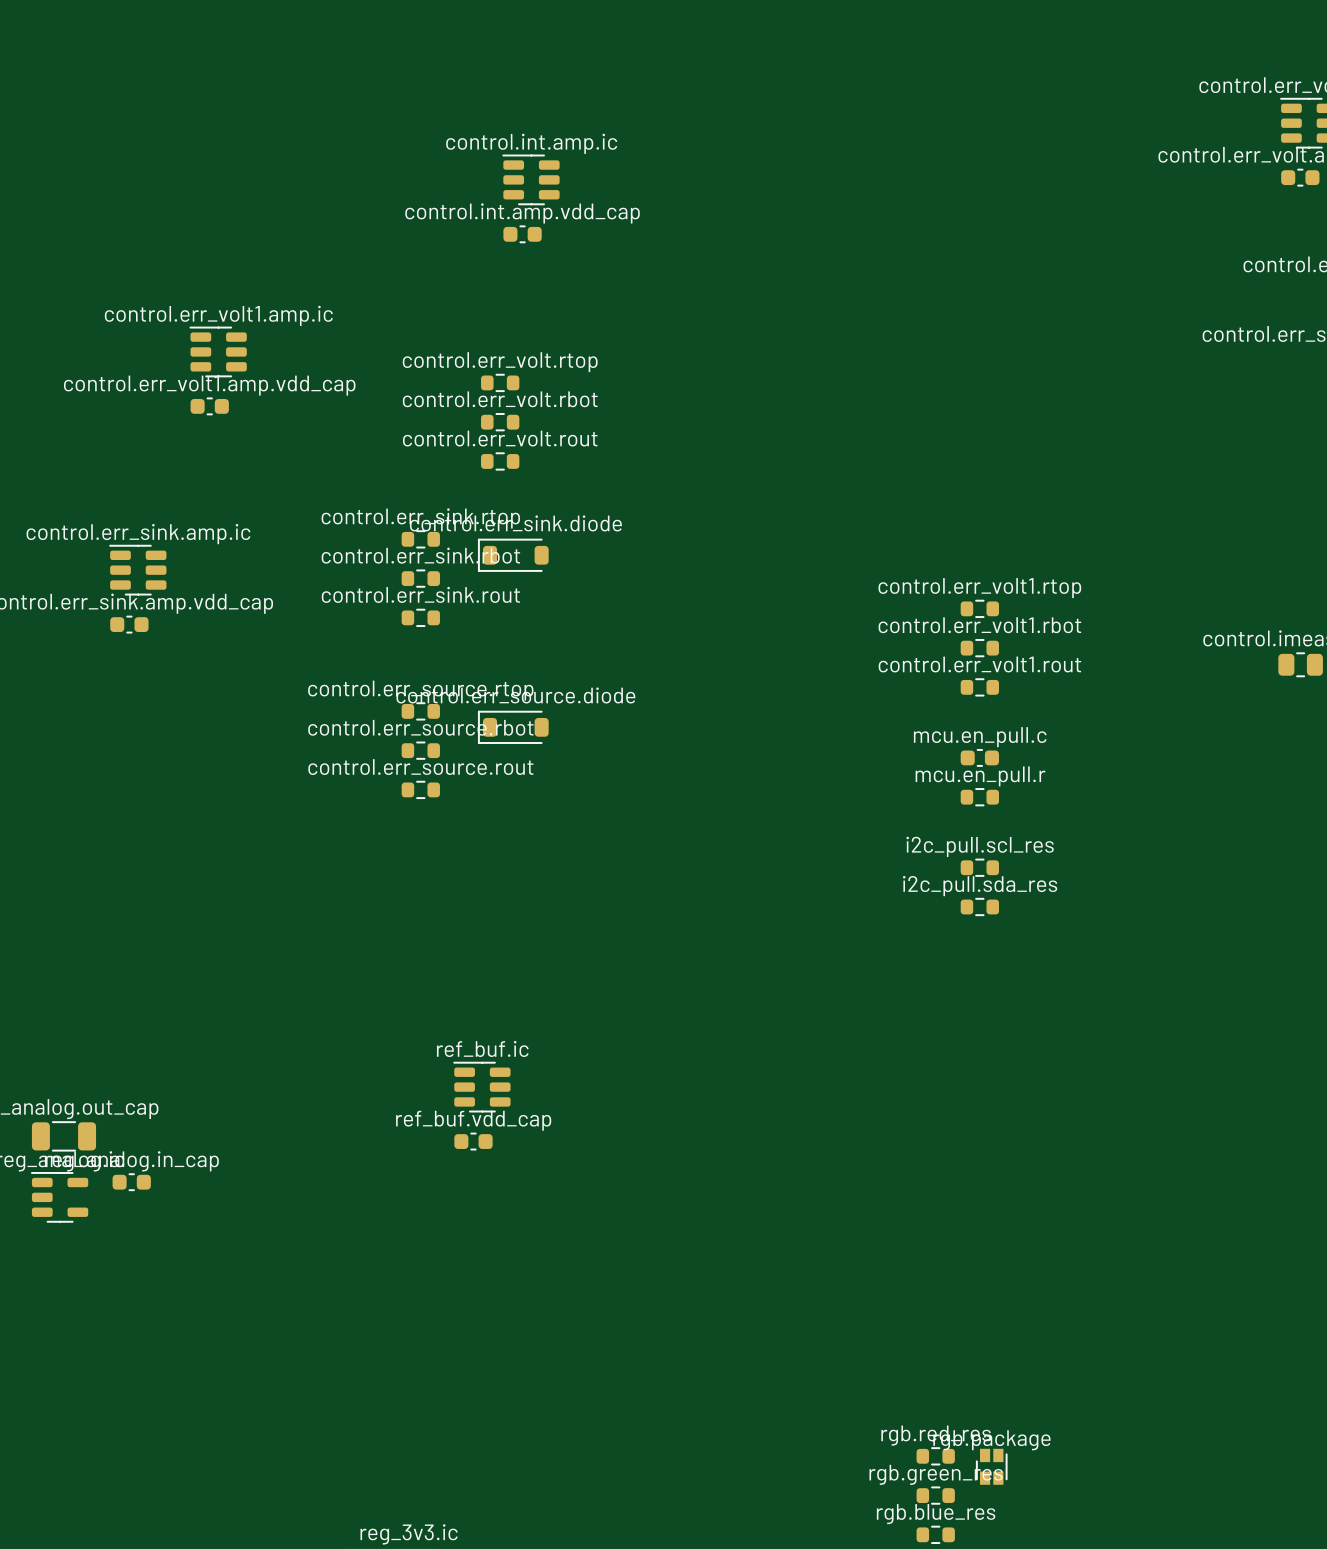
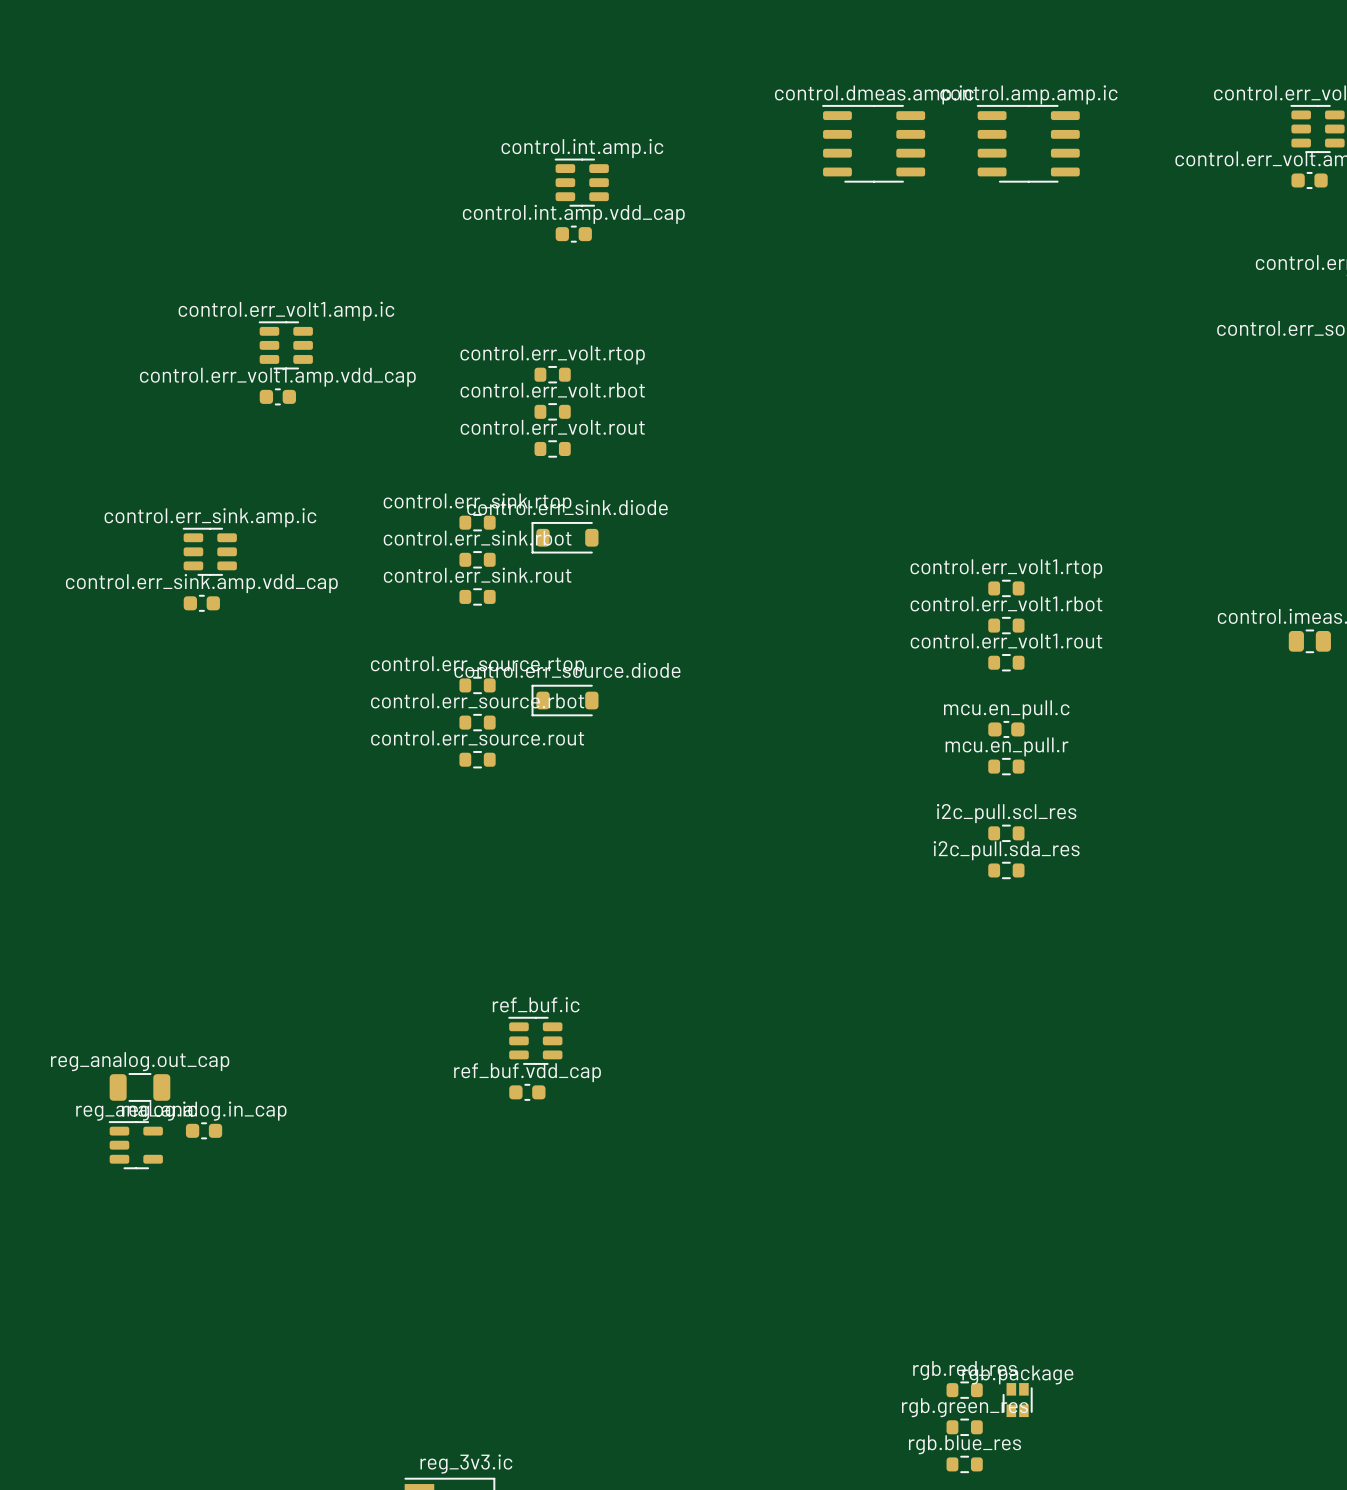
control.dmeas.amp.ic: none -> (873, 143)
control.amp.amp.ic: none -> (1028, 143)

